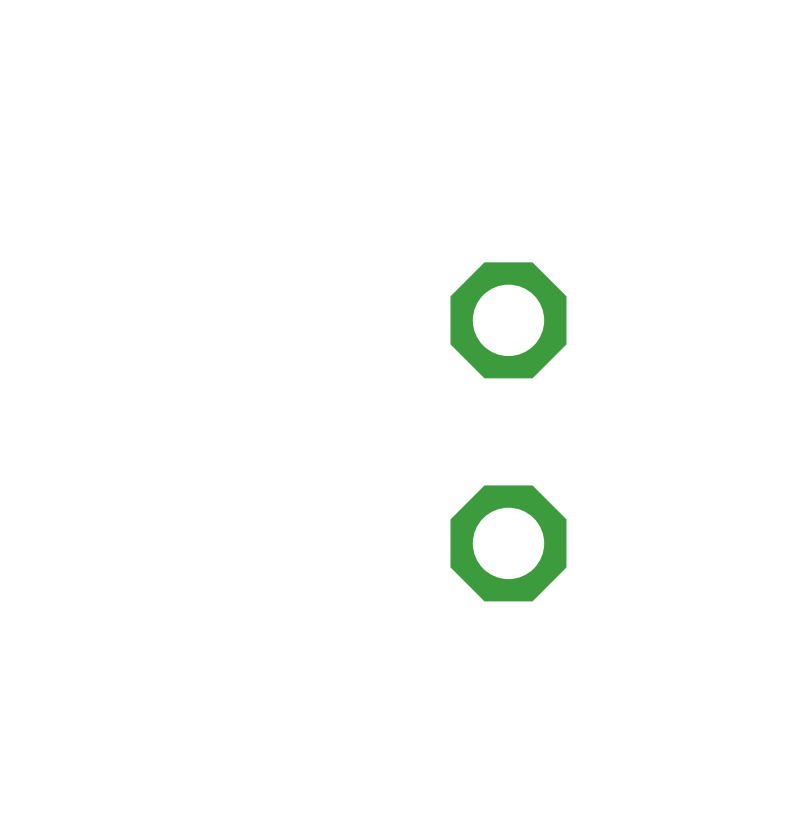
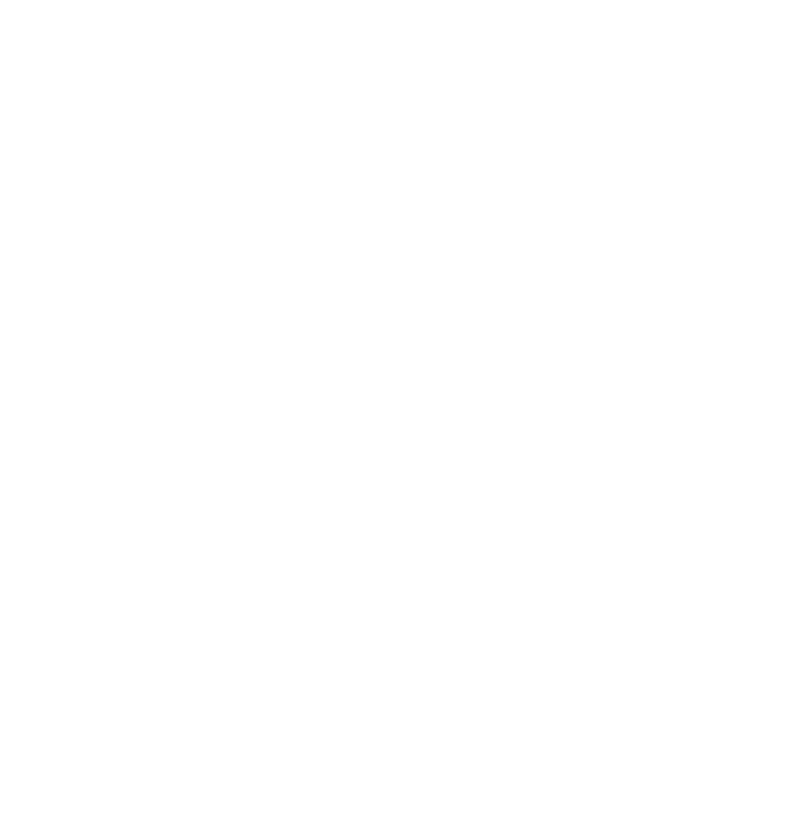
part: (508, 431) -> none

